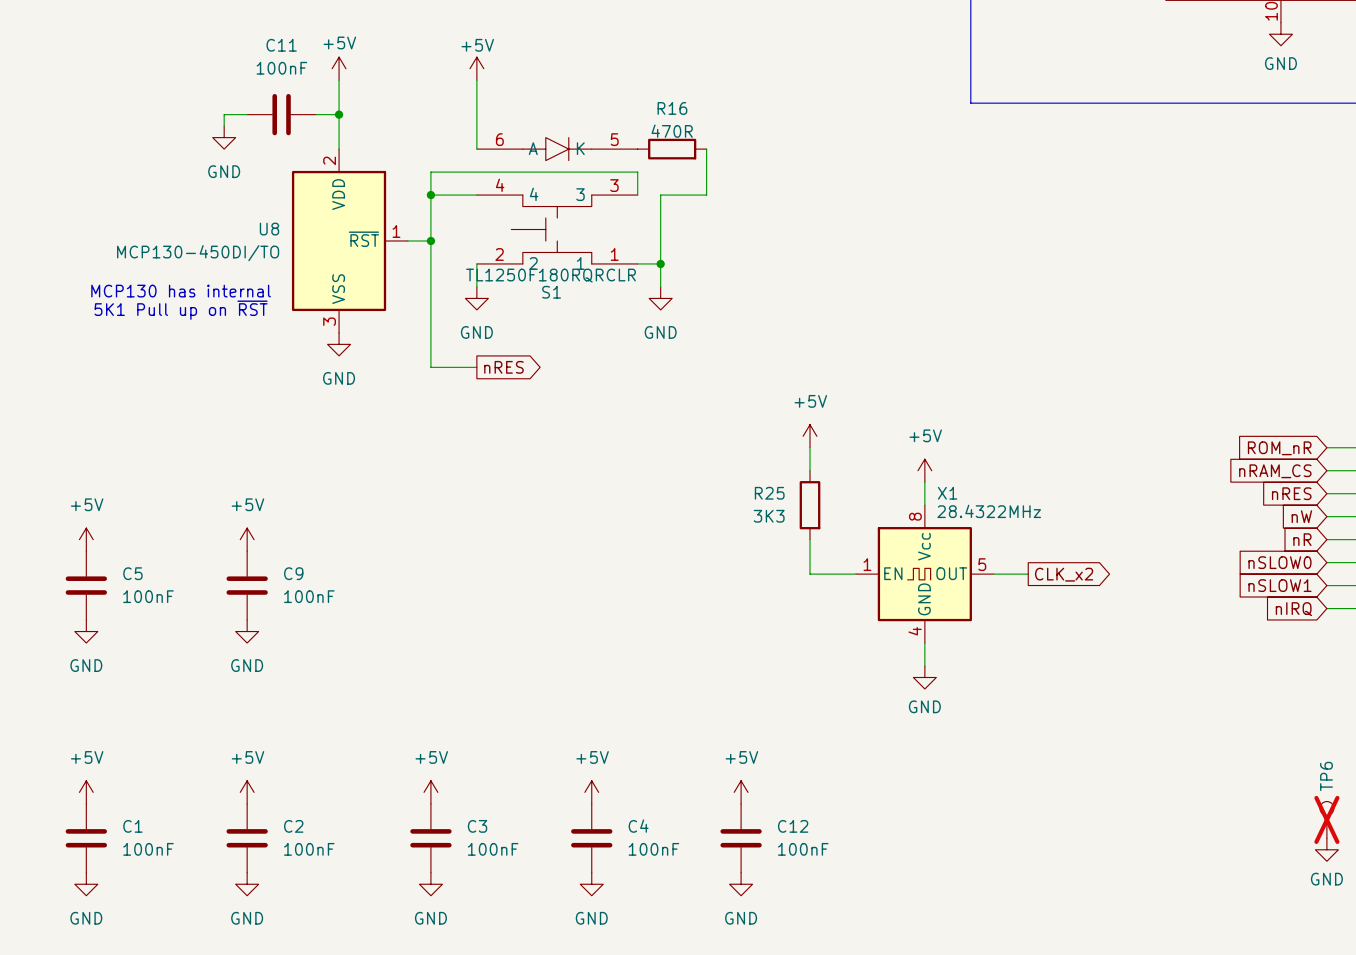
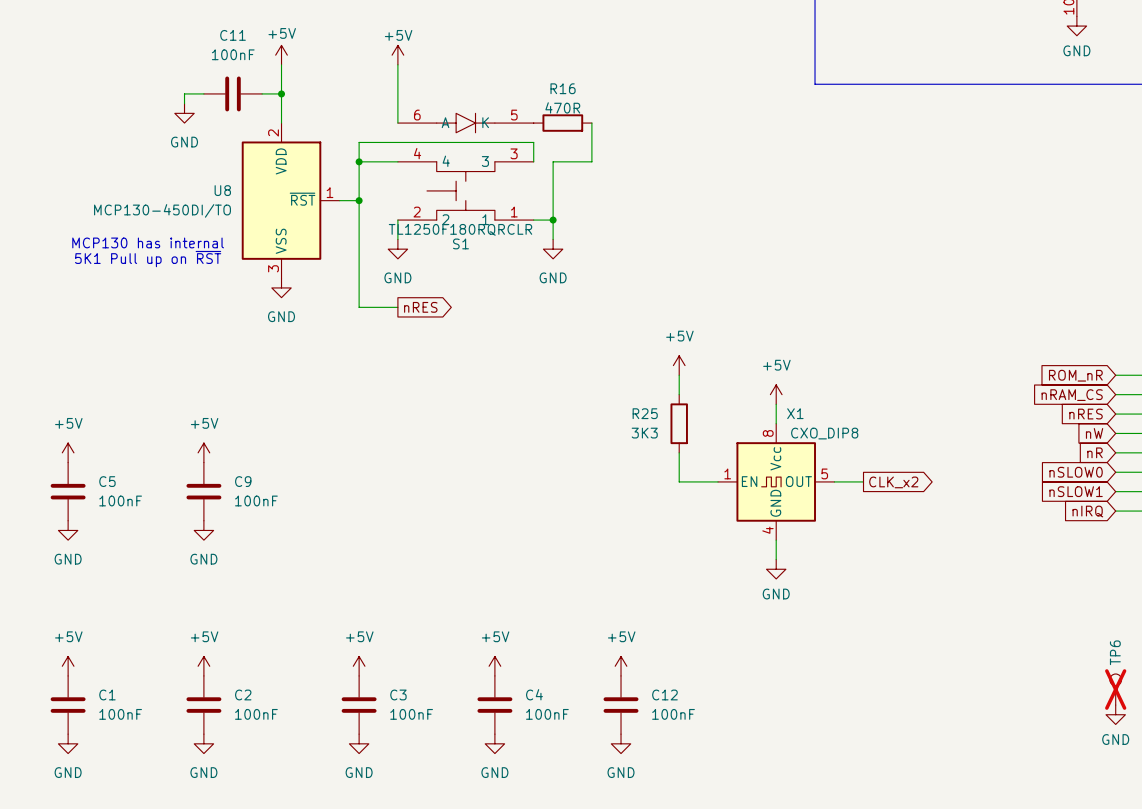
X1 value: 28.4322MHz (989, 511) -> CXO_DIP8 (824, 433)

